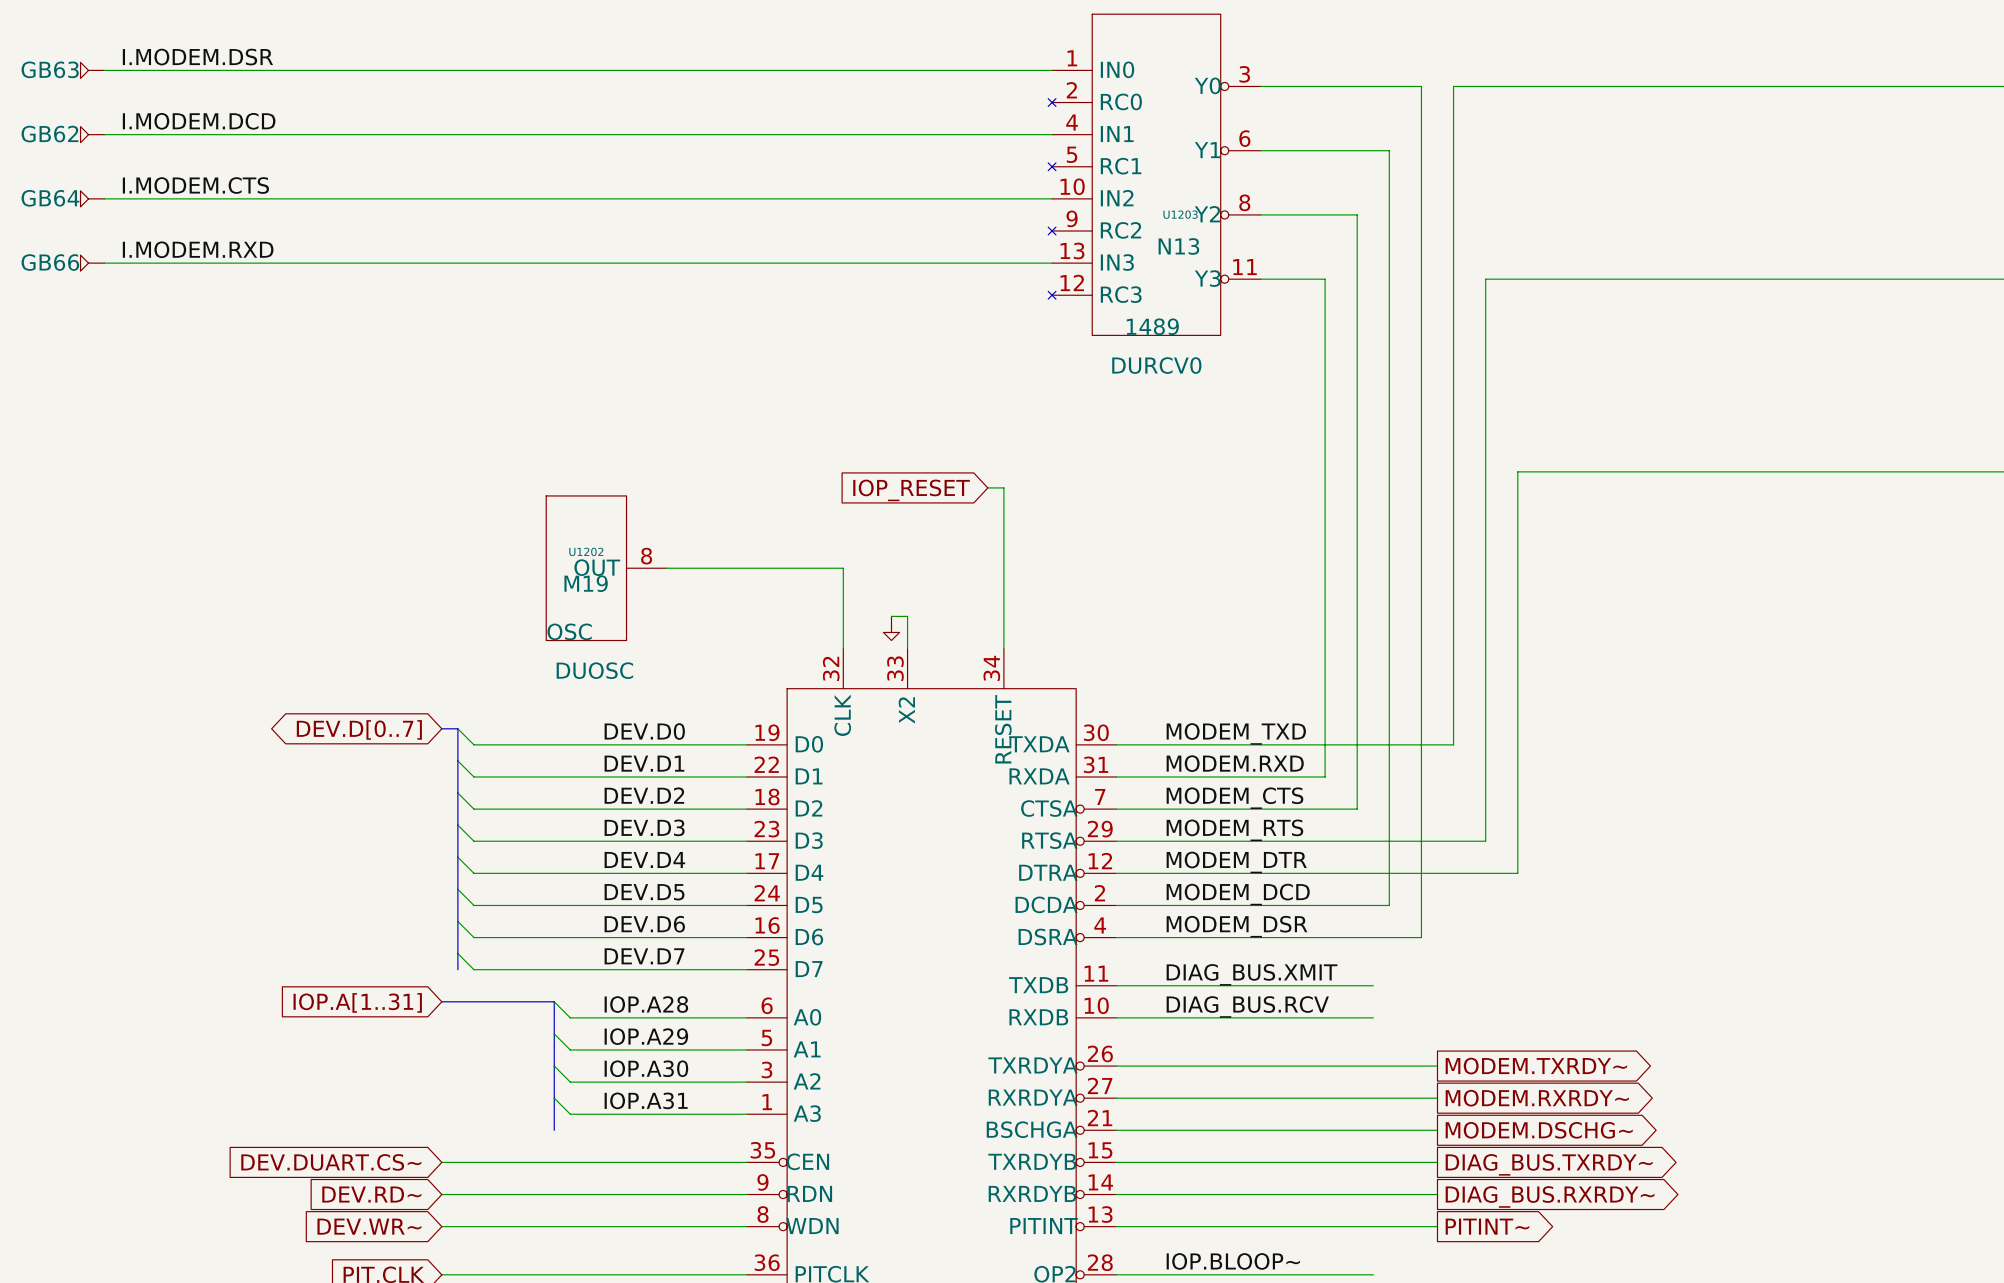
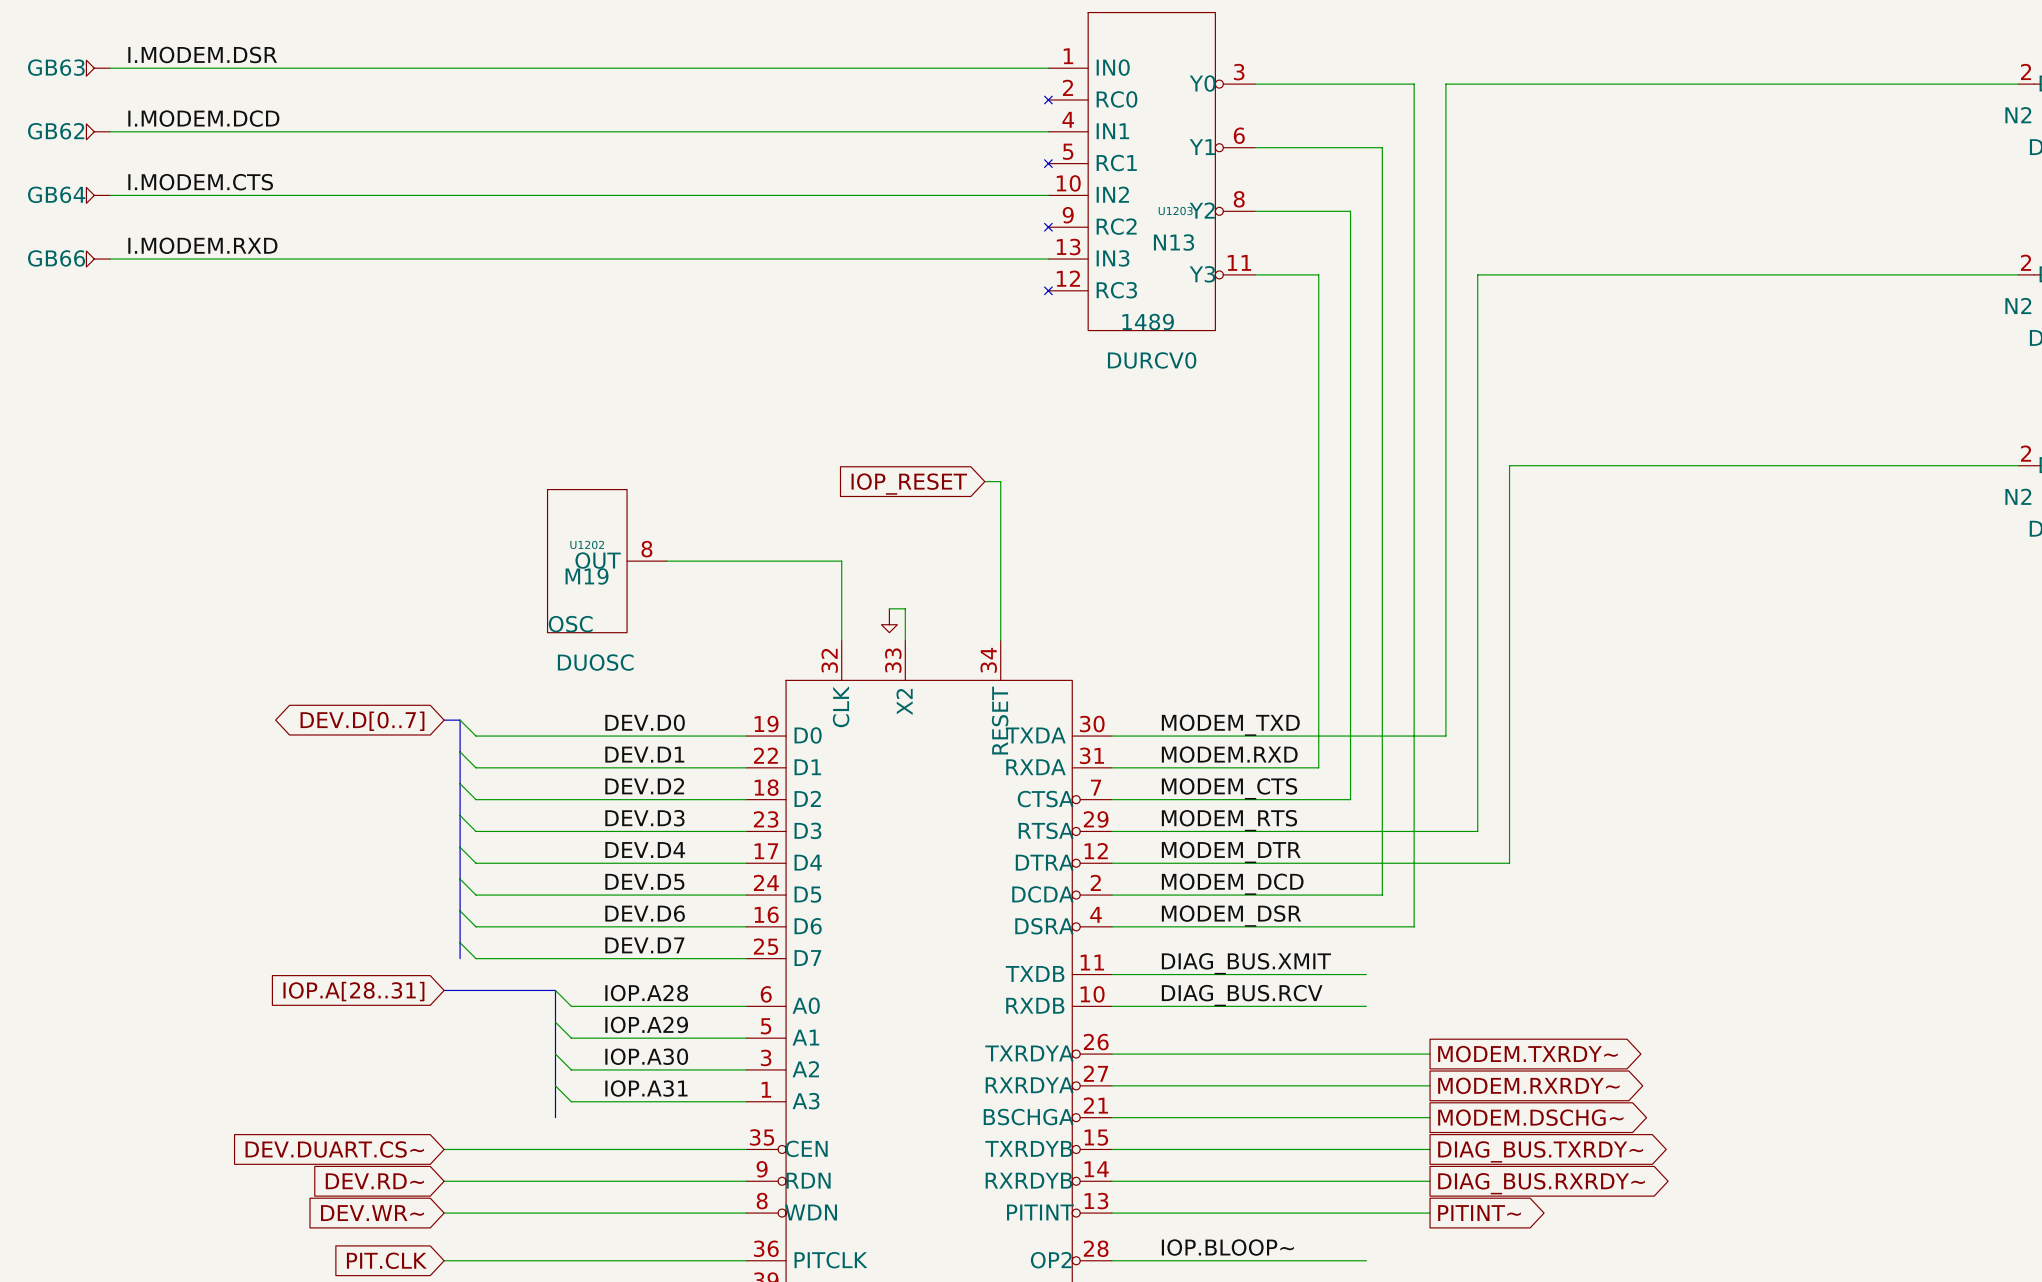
global label: IOP.A[1..31] (357, 1002) -> IOP.A[28..31] (353, 991)

